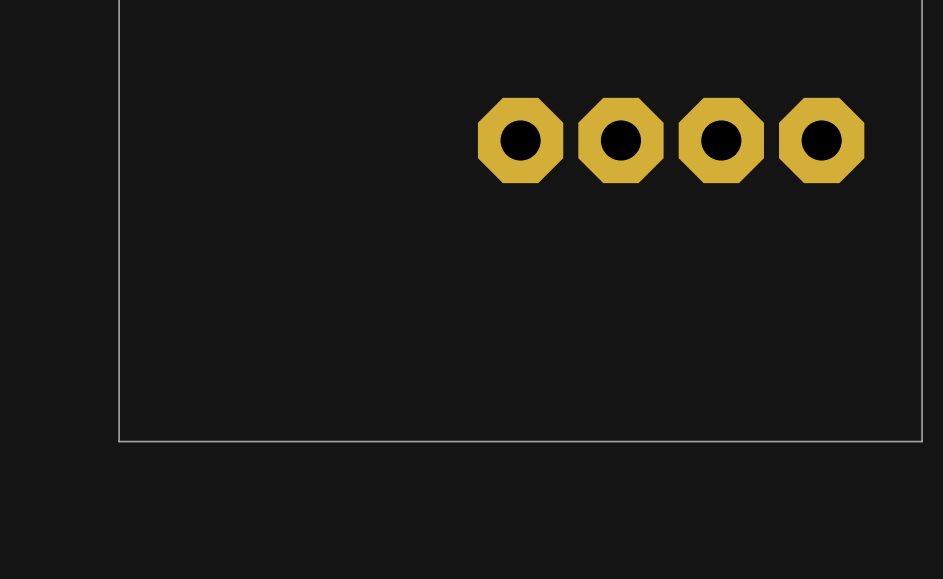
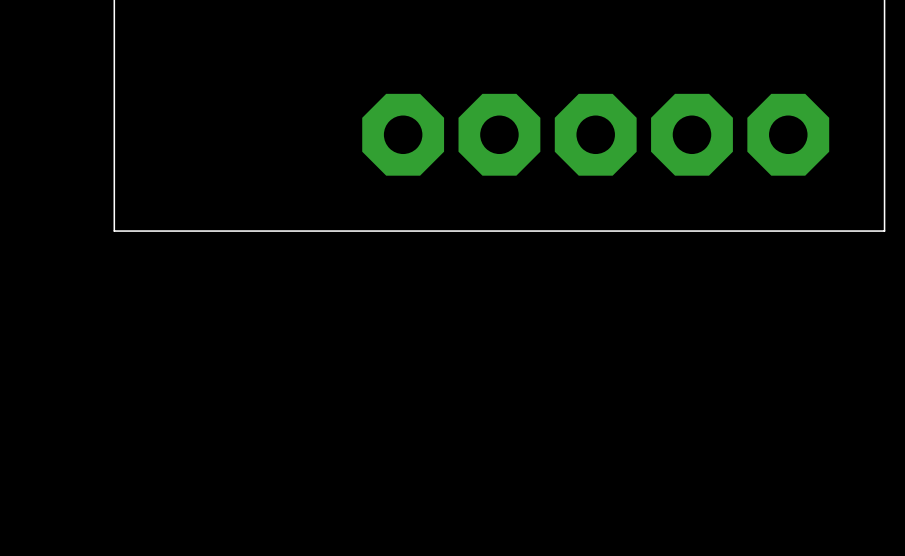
part: none -> (403, 134)
board edge: (922, 240) (922, 441) (119, 441) (119, 240) -> (884, 231) (114, 231)

